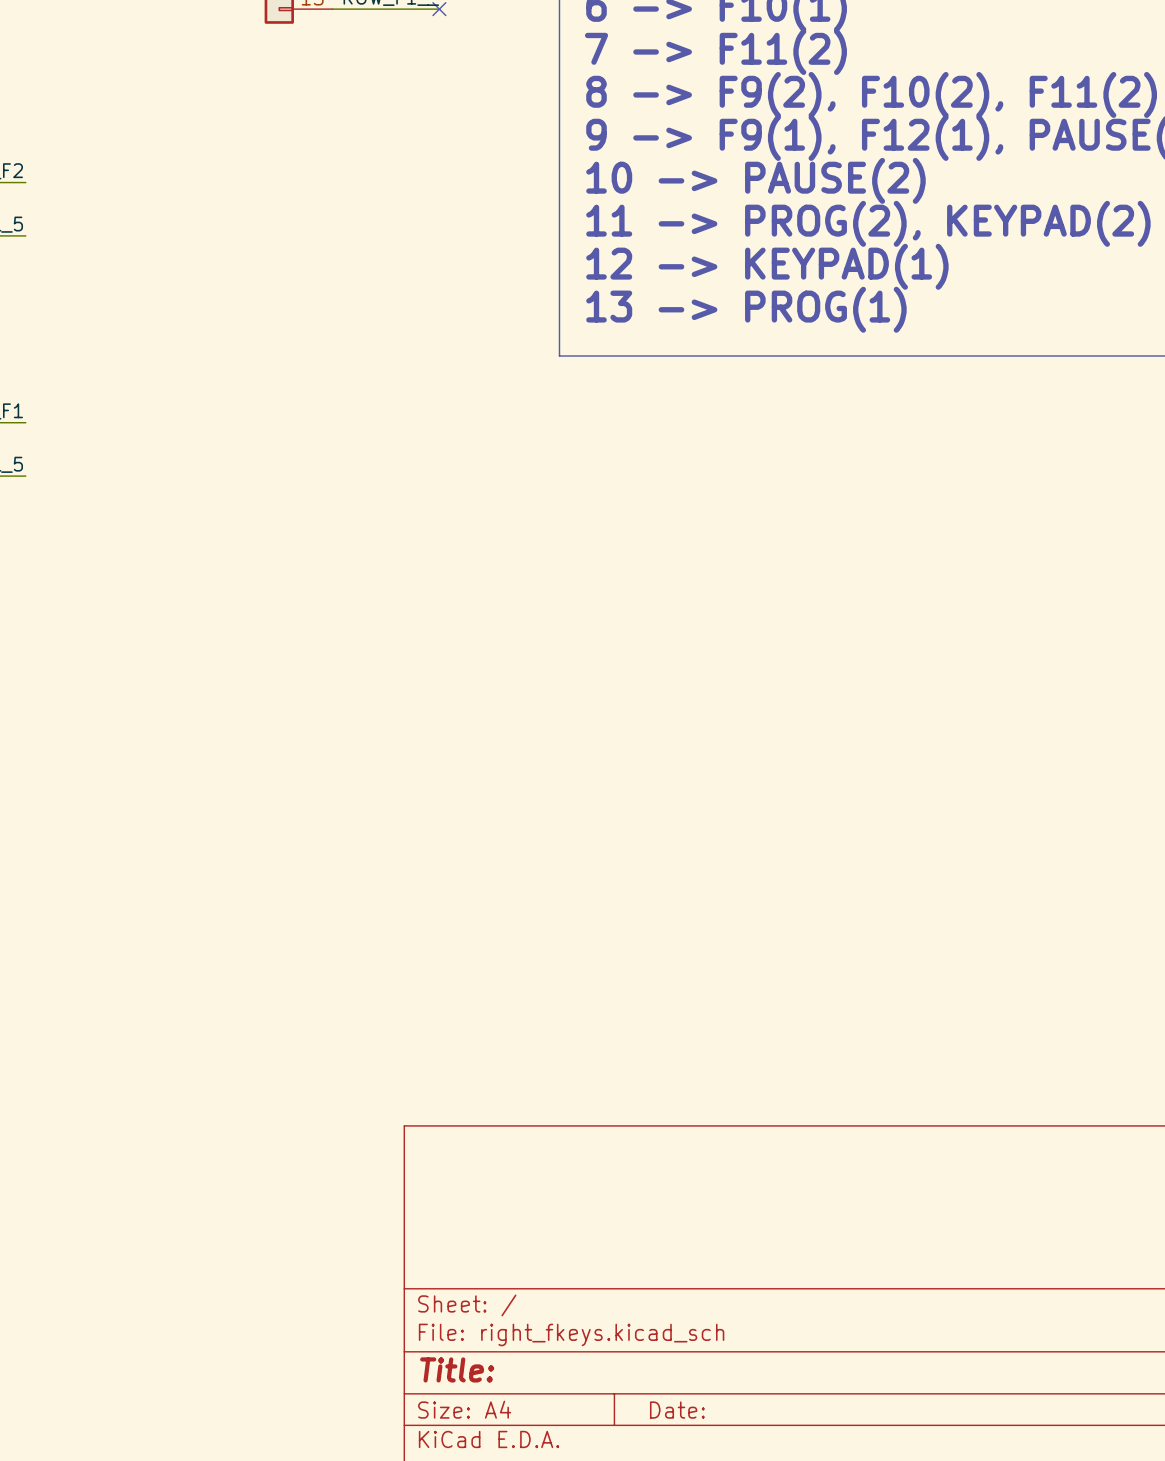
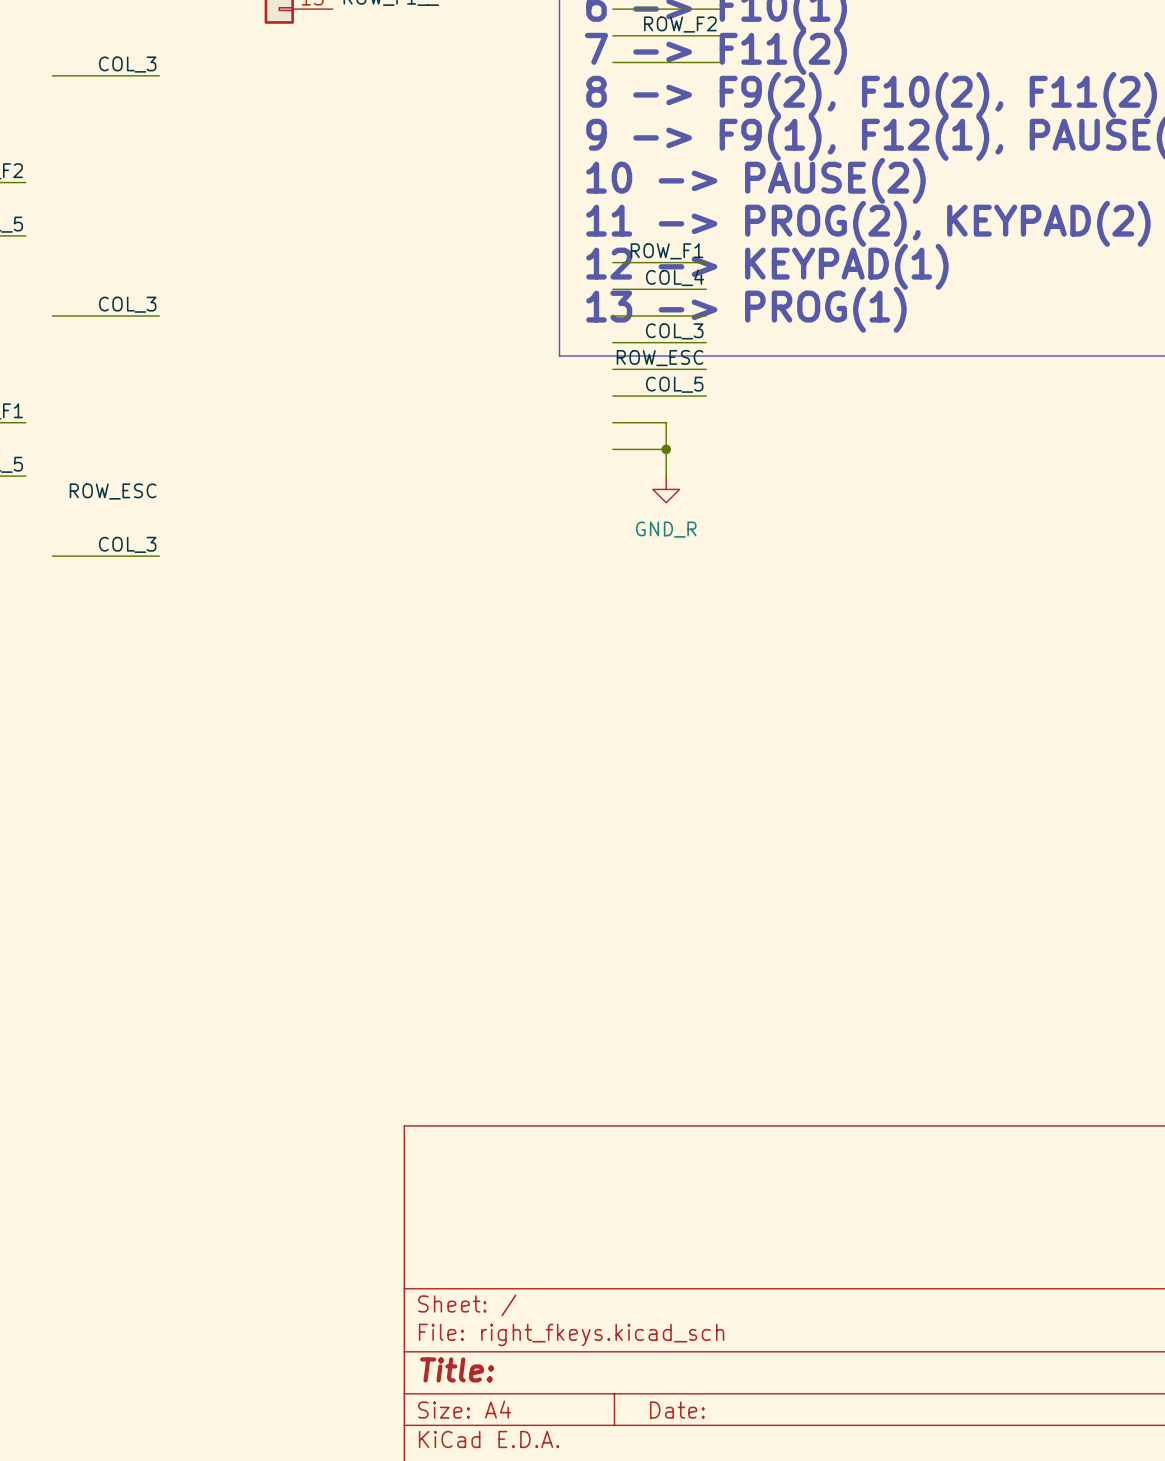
wire: (332, 9) (439, 9) -> none
no-connect mark: (439, 9) -> none
wire: none -> (612, 9) (719, 9)
label: none -> ROW_F2 (680, 24)
wire: none -> (612, 35) (719, 35)
wire: none -> (612, 62) (719, 62)
label: none -> COL_3 (127, 64)
wire: none -> (52, 75) (159, 75)
label: none -> ROW_F1 (667, 251)
wire: none -> (612, 262) (706, 262)
label: none -> COL_4 (675, 277)
wire: none -> (612, 289) (706, 289)
label: none -> COL_3 (127, 304)
wire: none -> (52, 315) (159, 315)
wire: none -> (612, 315) (706, 315)
label: none -> COL_3 (674, 331)
wire: none -> (612, 342) (706, 342)
label: none -> ROW_ESC (660, 358)
wire: none -> (612, 369) (706, 369)
label: none -> COL_5 (674, 384)
wire: none -> (612, 396) (706, 396)
wire: none -> (612, 422) (666, 422) (666, 476)
wire: none -> (612, 449) (666, 449)
junction: none -> (666, 449)
power symbol: none -> GND_R (666, 489)
label: none -> ROW_ESC (113, 491)
label: none -> COL_3 (127, 544)
wire: none -> (52, 556) (159, 556)

